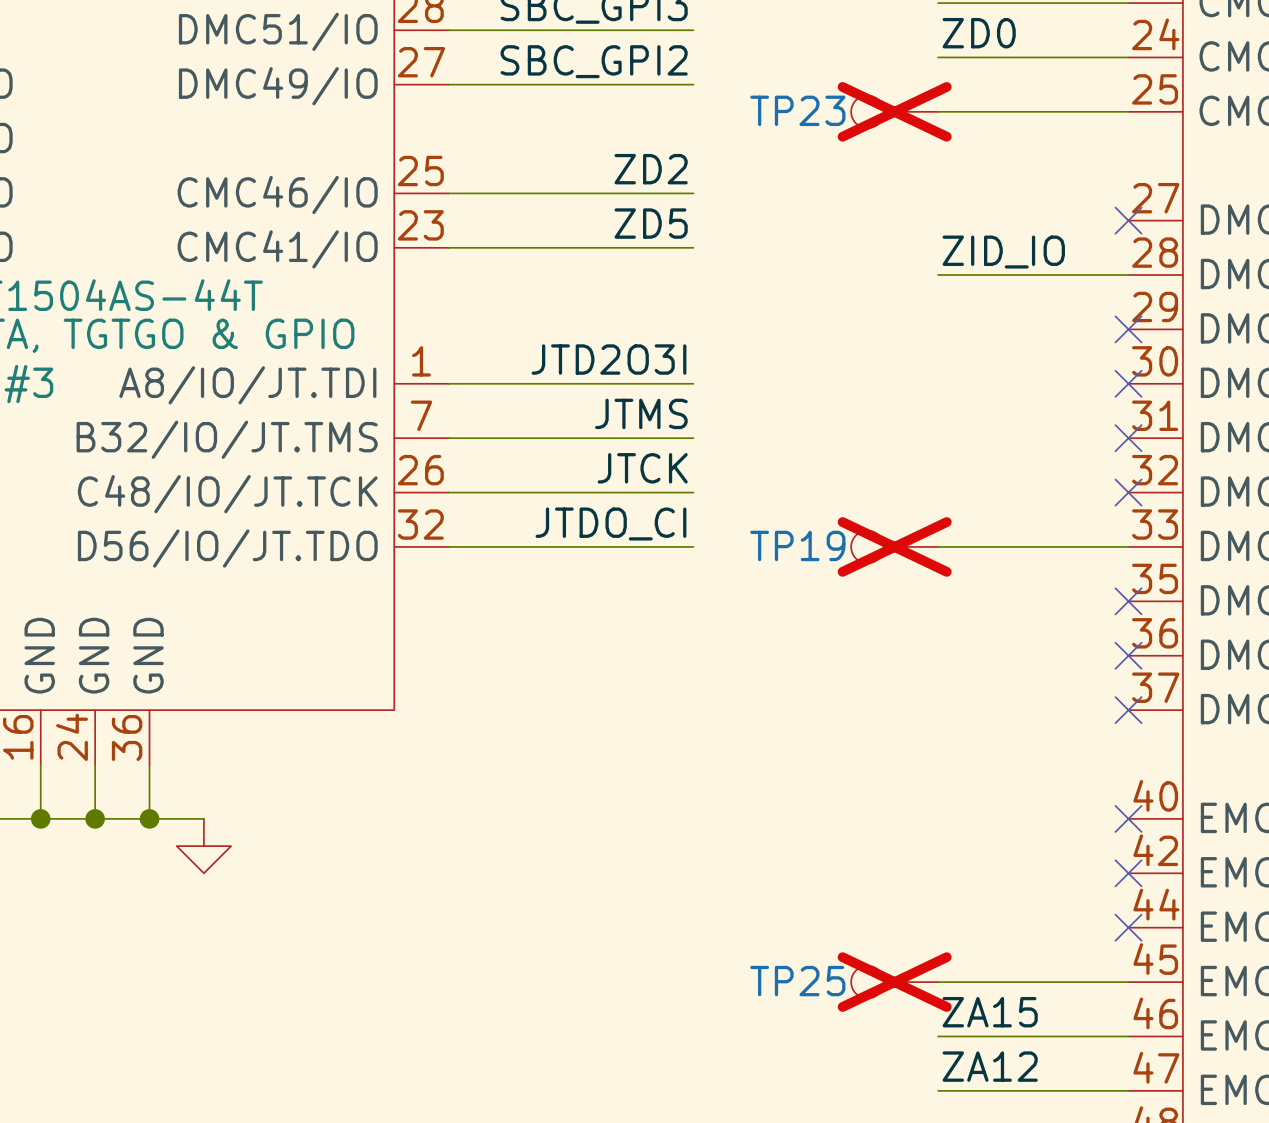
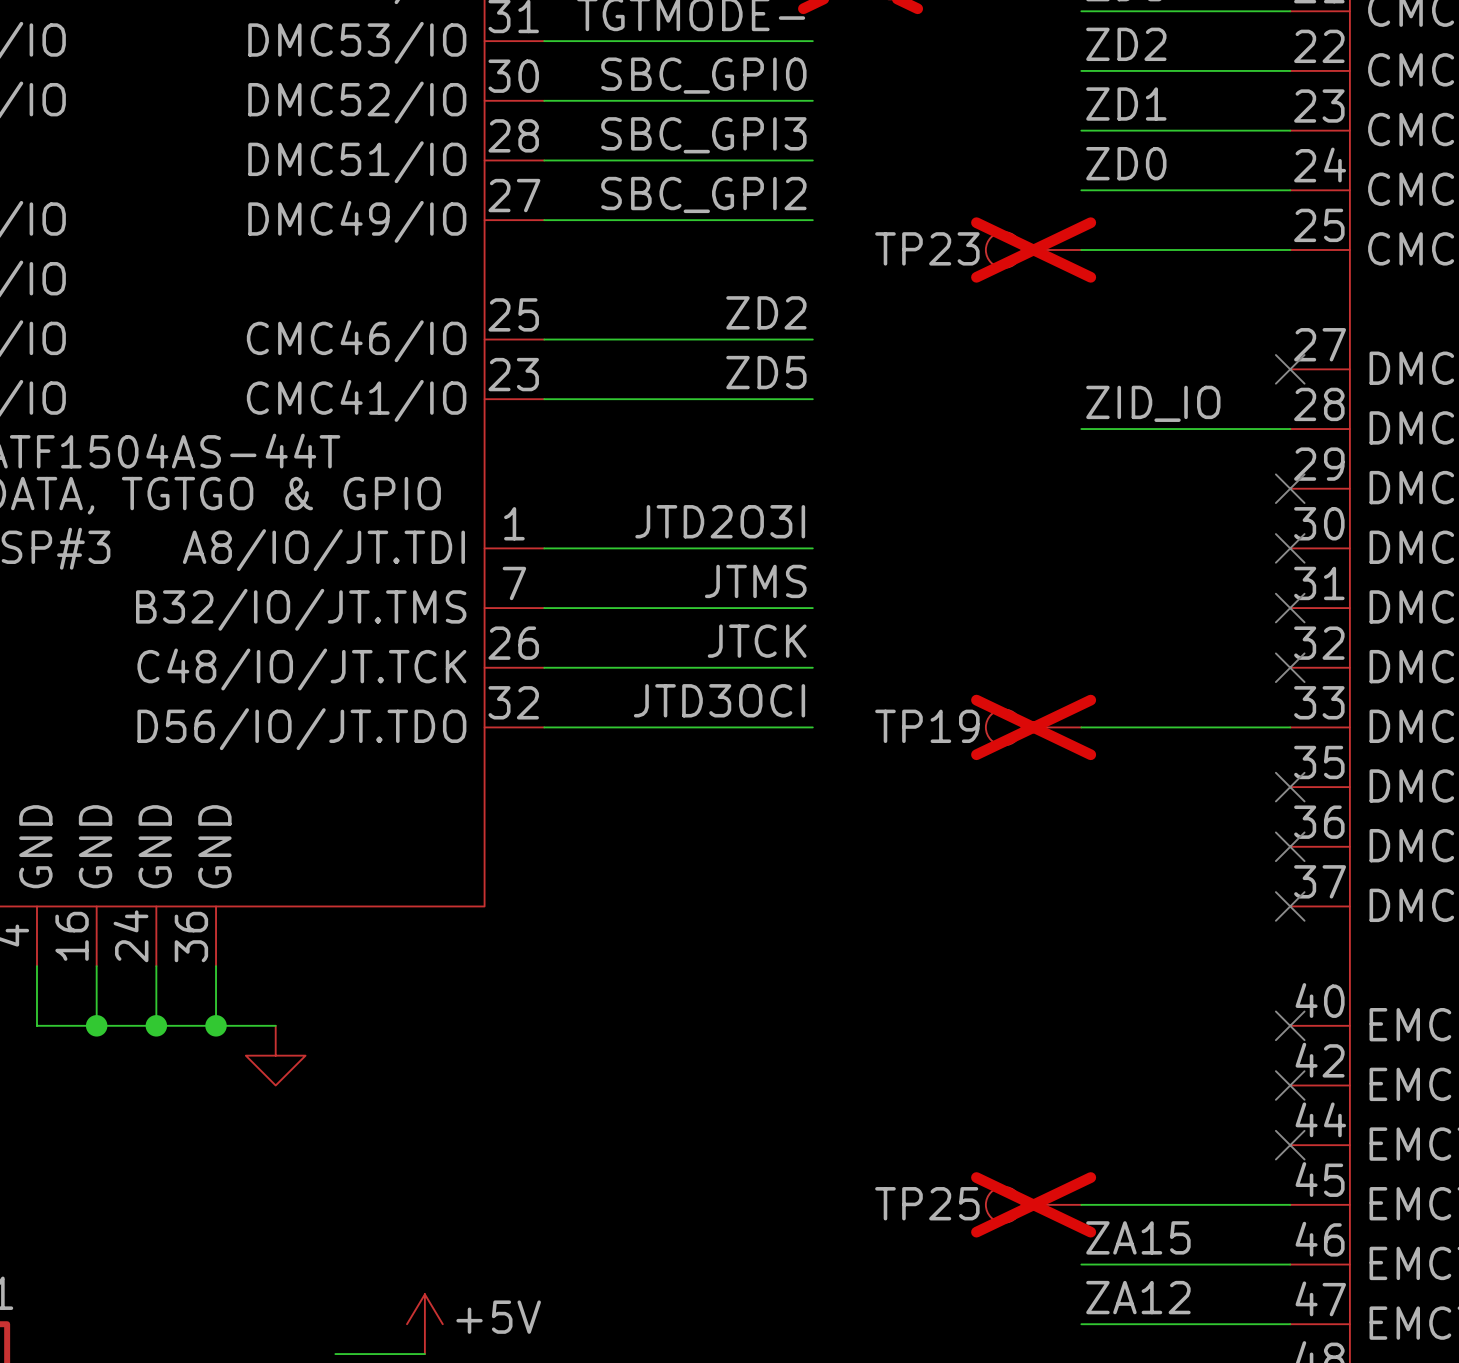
label: JTDO_CI (610, 523) -> JTD3OCI (719, 700)
power symbol: none -> +5V (424, 1324)
wire: none -> (335, 1354) (424, 1354)

